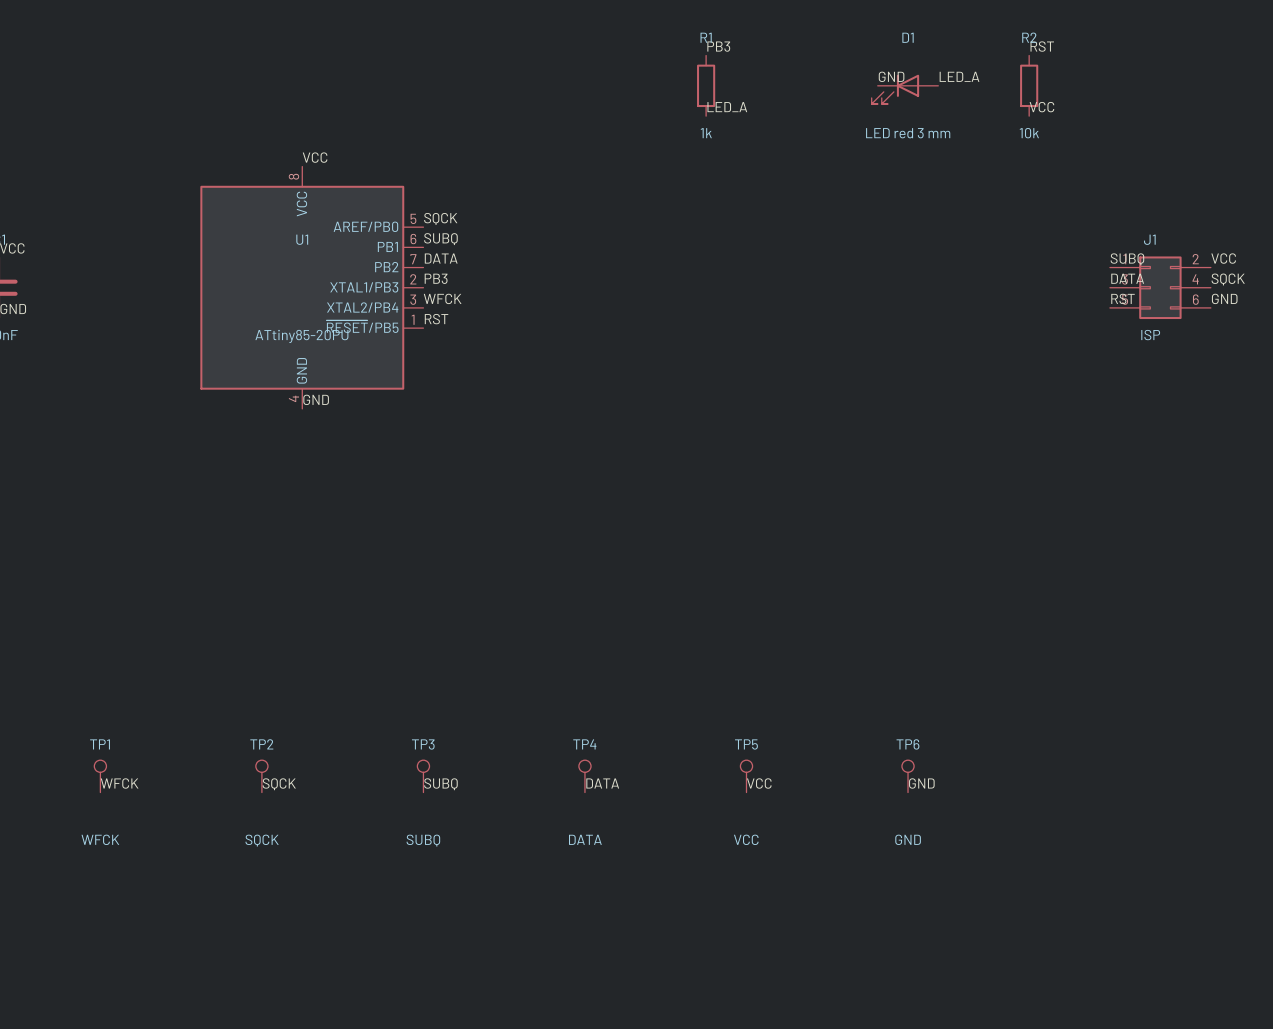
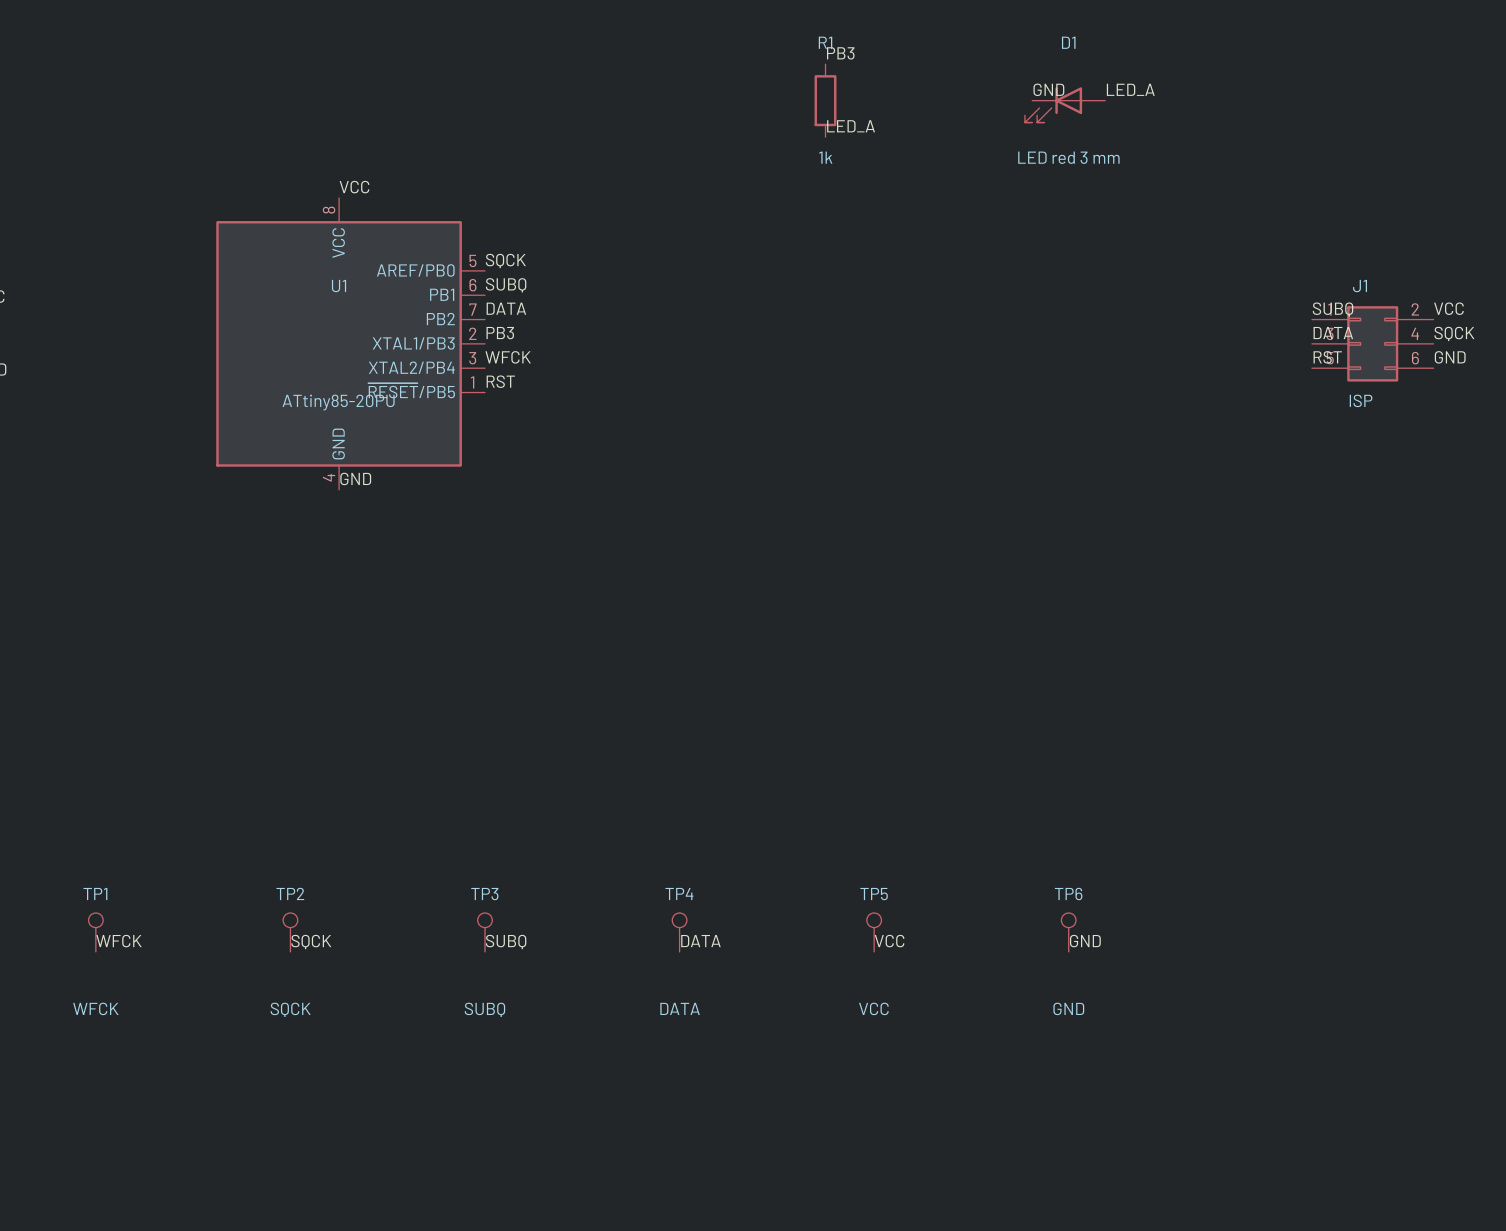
label: RST (1042, 46) -> none
R2: 10k (1029, 85) -> none
label: VCC (1041, 107) -> none

